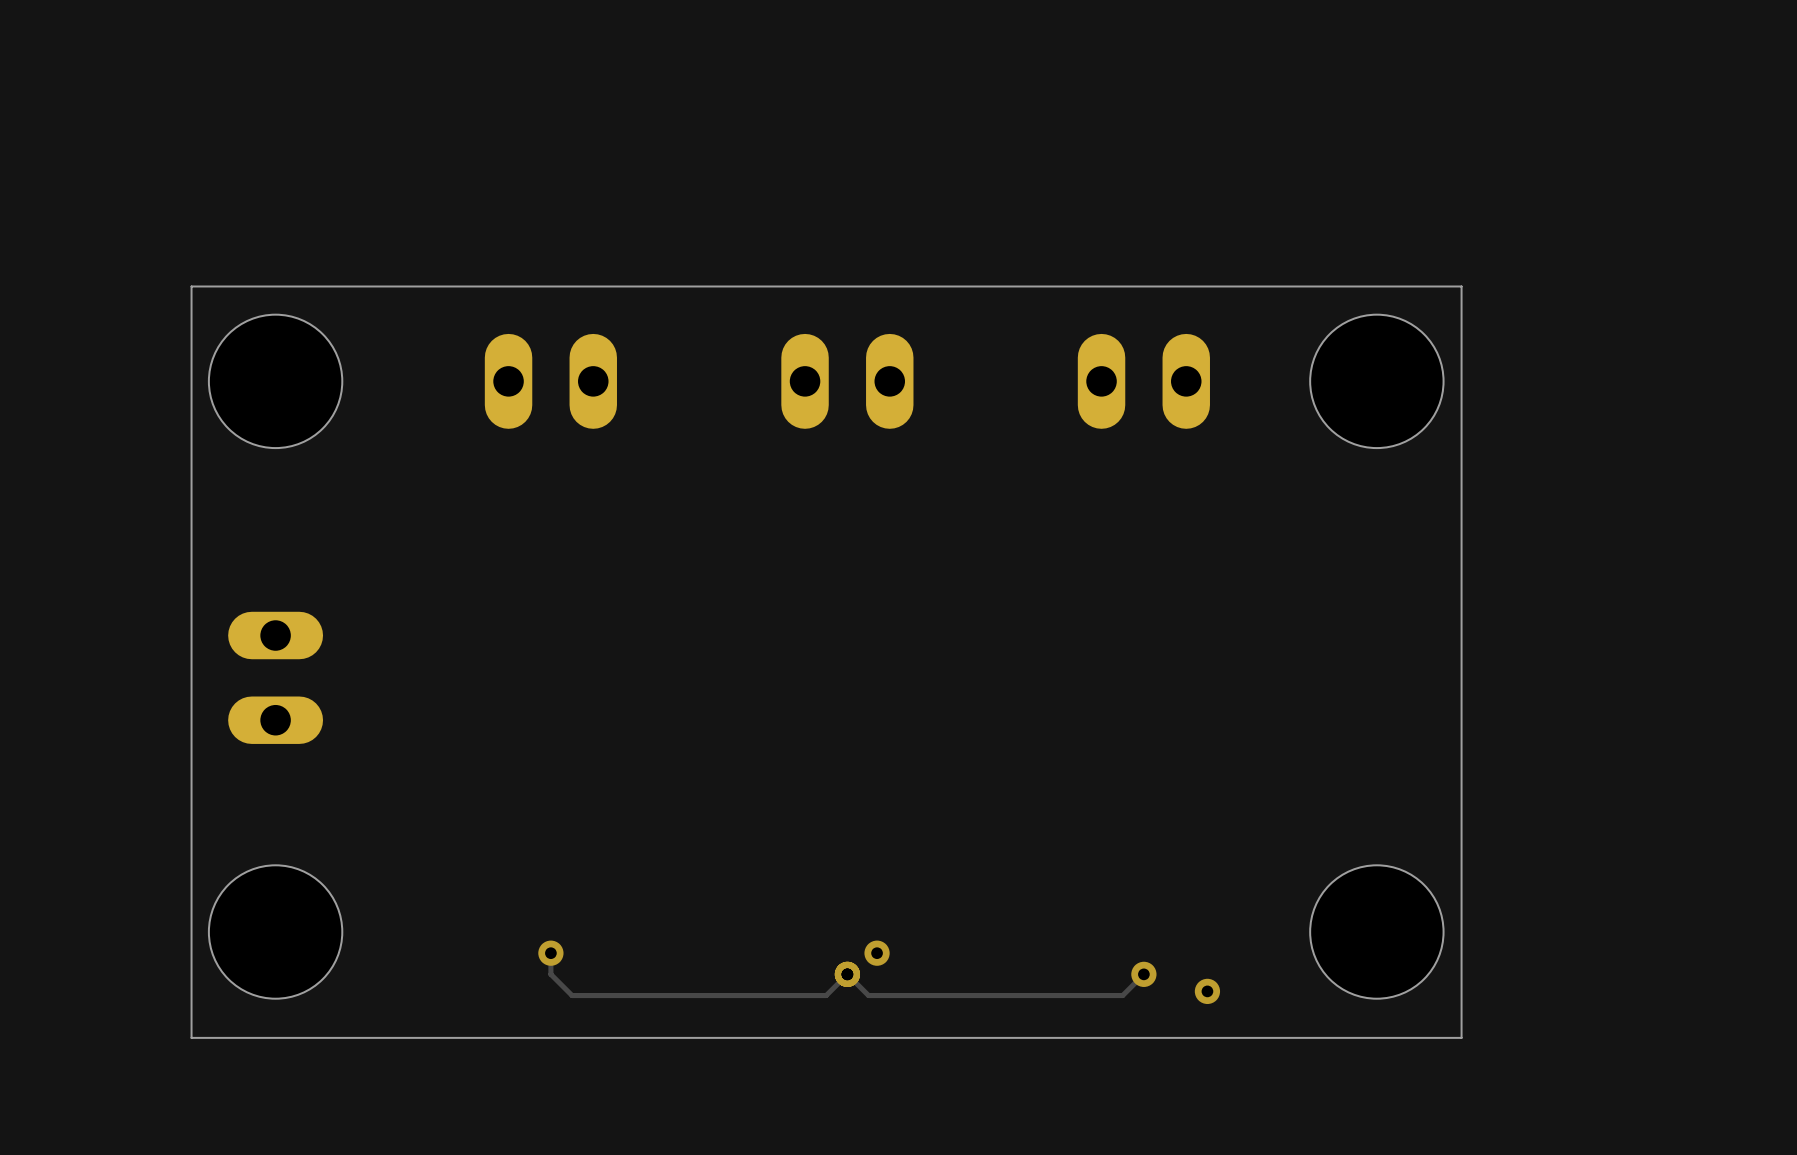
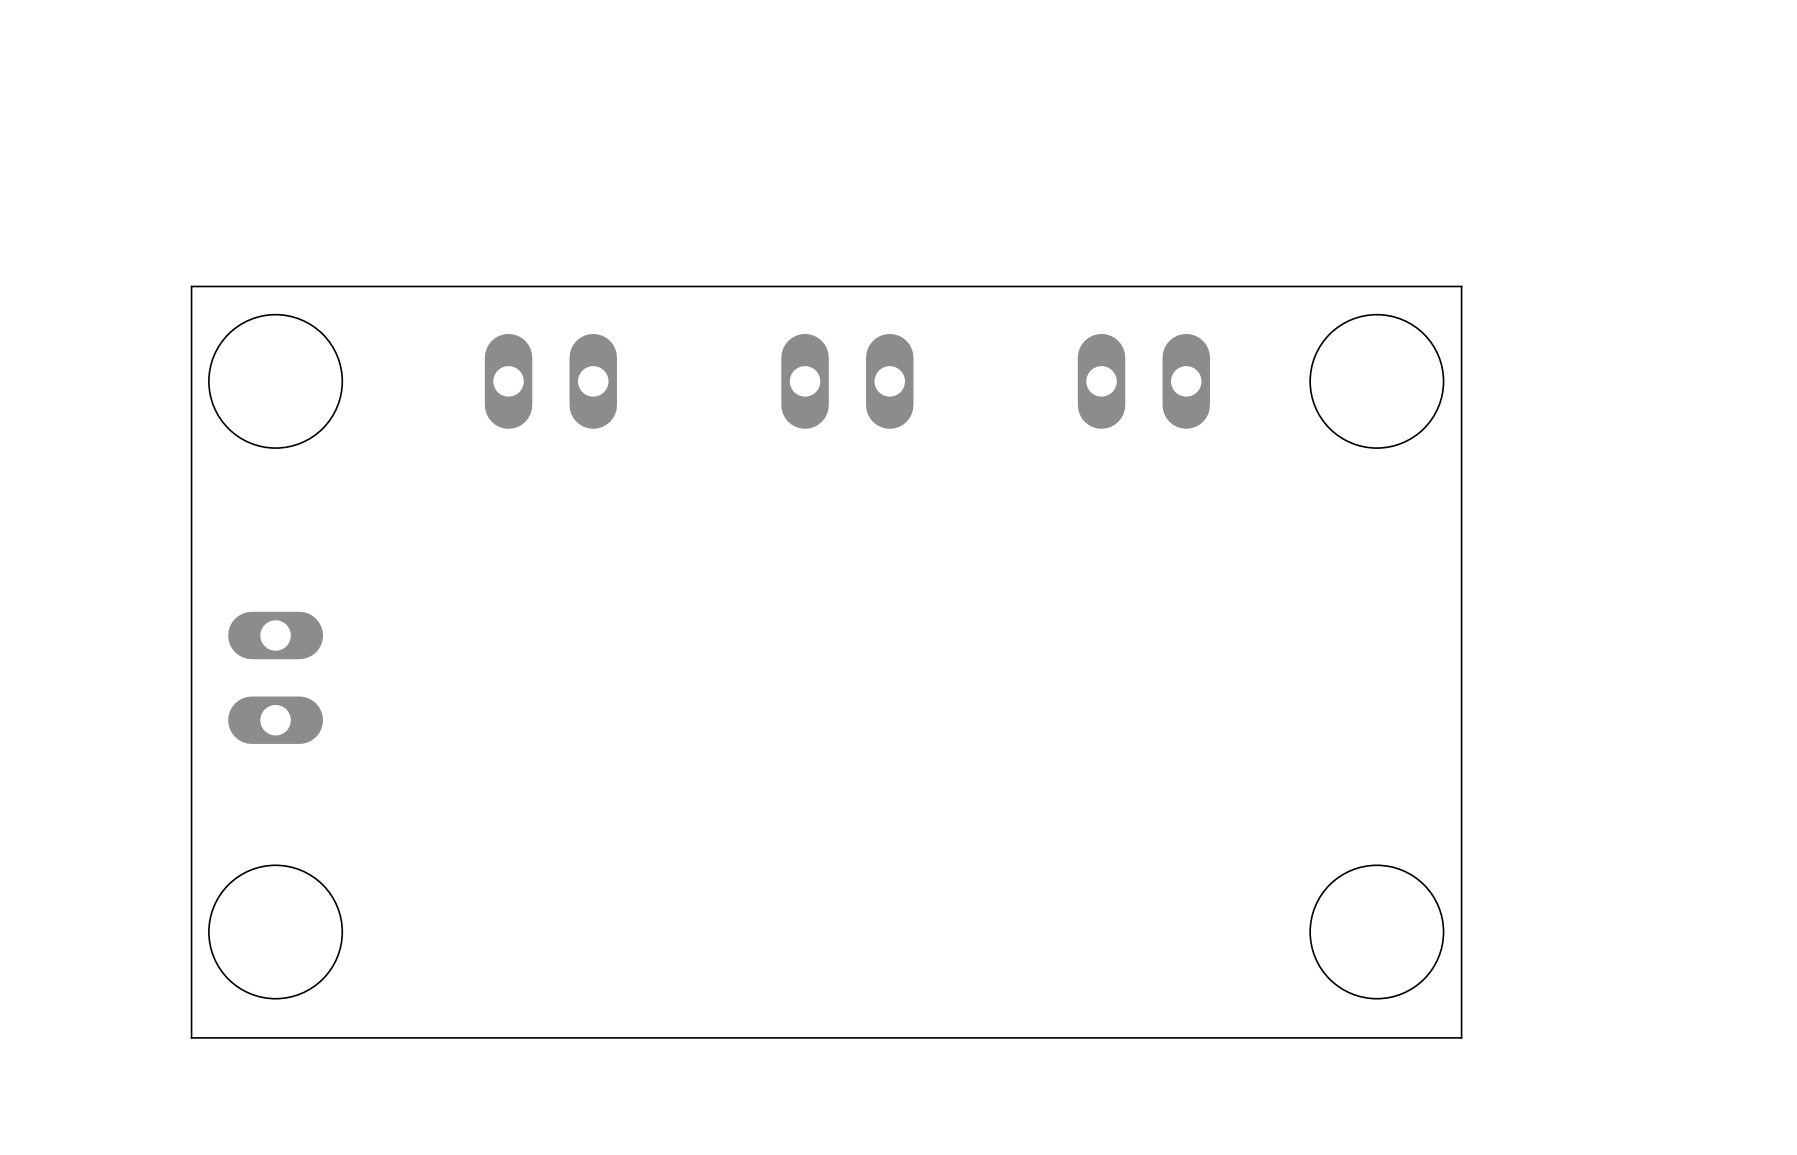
track: (550, 953) (550, 974) (572, 995) (826, 995) (847, 974) (868, 995) (1122, 995) (1143, 974) -> none
via: (550, 953) -> none
via: (877, 953) -> none
via: (847, 974) -> none
via: (1143, 974) -> none
via: (1207, 991) -> none

